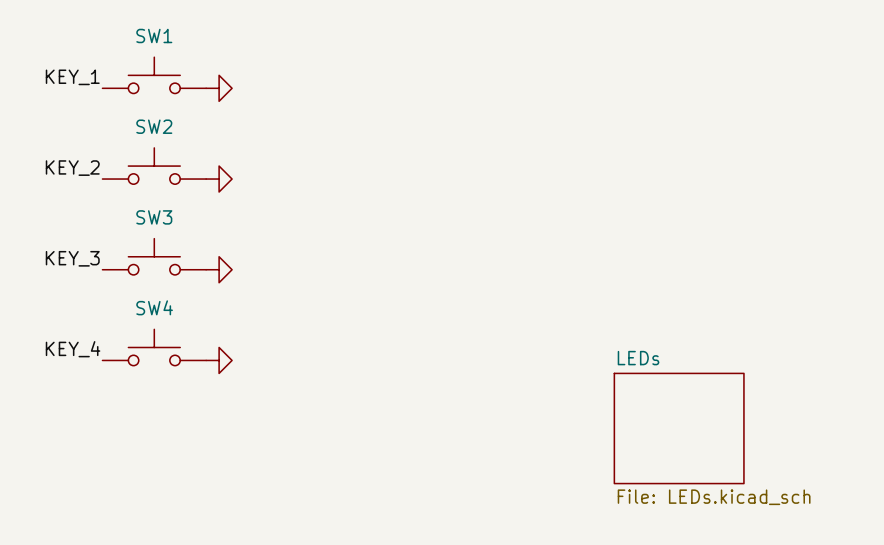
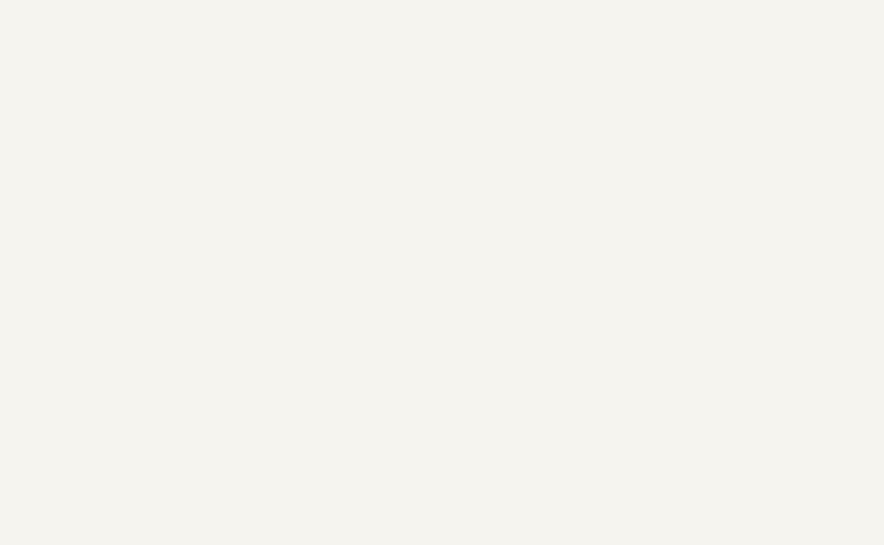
SW1: (154, 75) -> none
label: KEY_1 (72, 77) -> none
power symbol: (219, 88) -> none
SW2: (154, 166) -> none
label: KEY_2 (72, 168) -> none
power symbol: (219, 179) -> none
SW3: (154, 256) -> none
label: KEY_3 (72, 258) -> none
power symbol: (219, 269) -> none
SW4: (154, 347) -> none
label: KEY_4 (73, 349) -> none
power symbol: (219, 360) -> none
sheet LEDs: File: LEDs.kicad_sch (679, 428) -> none

